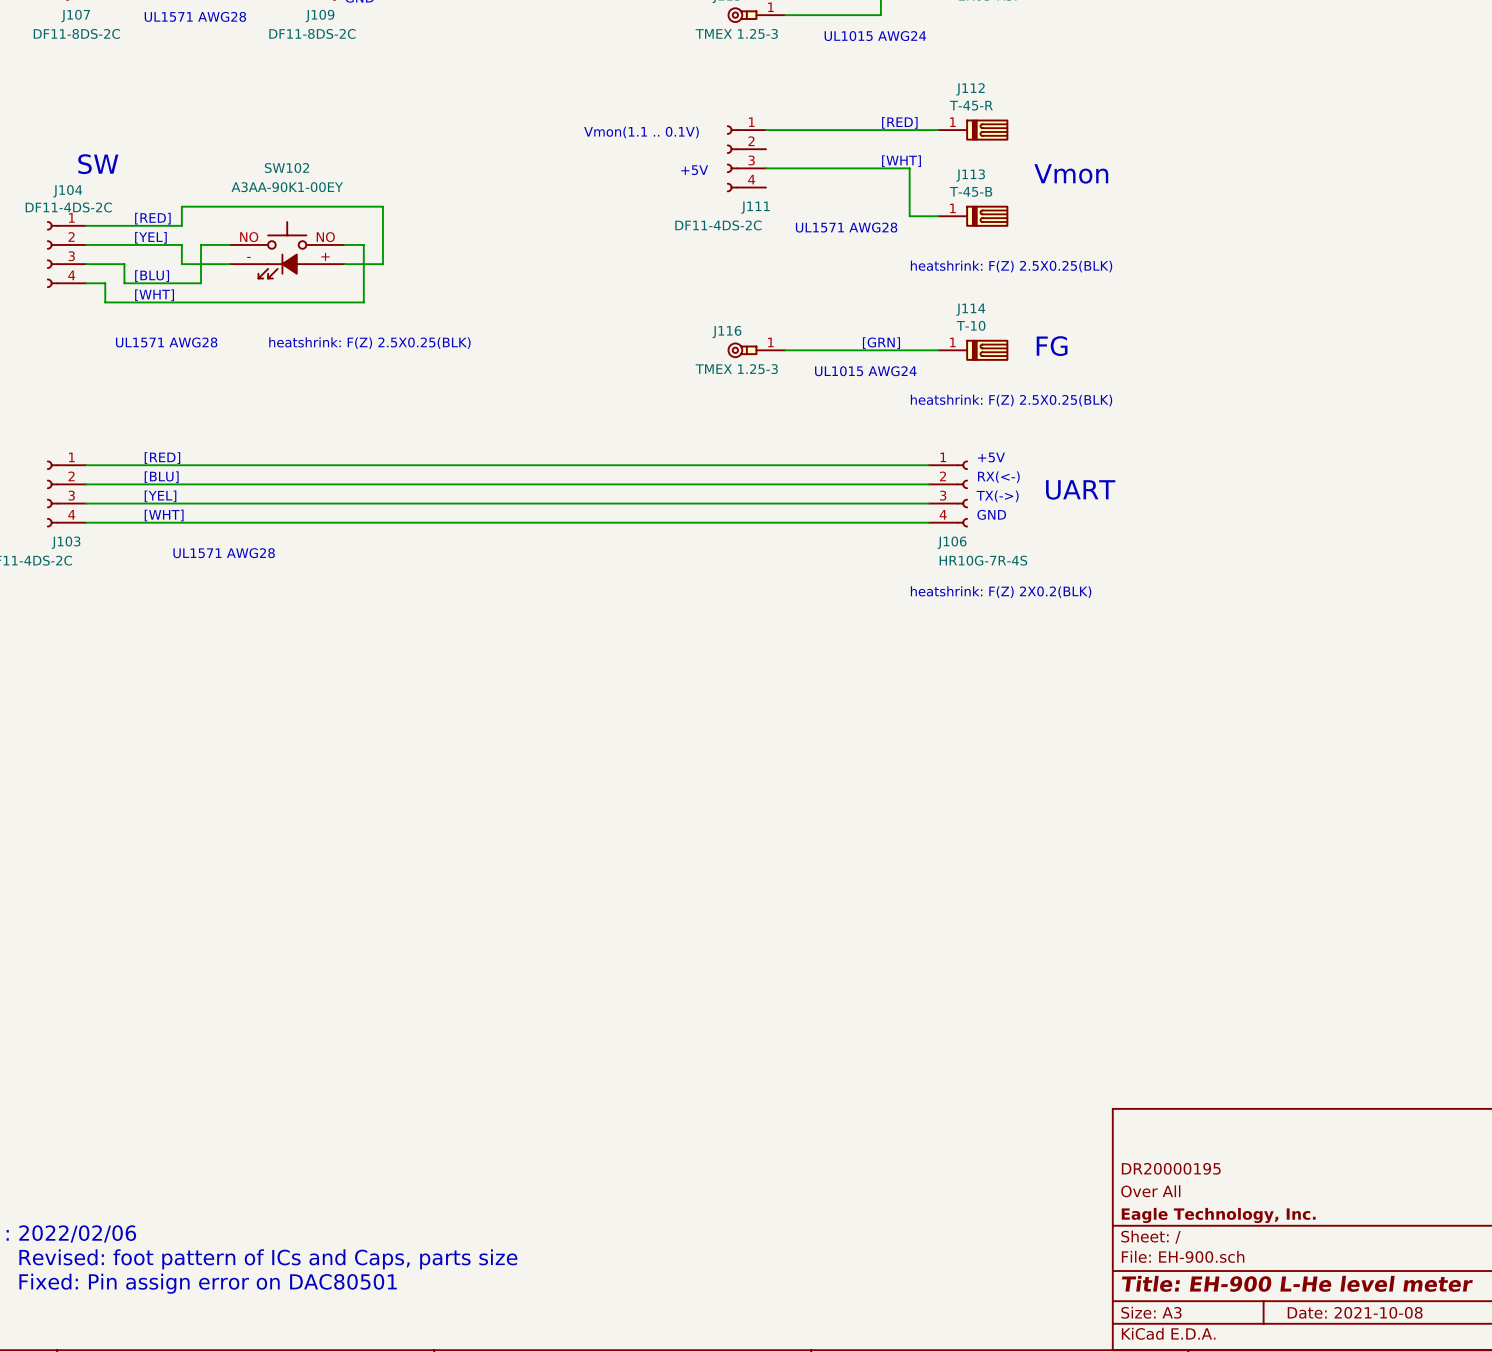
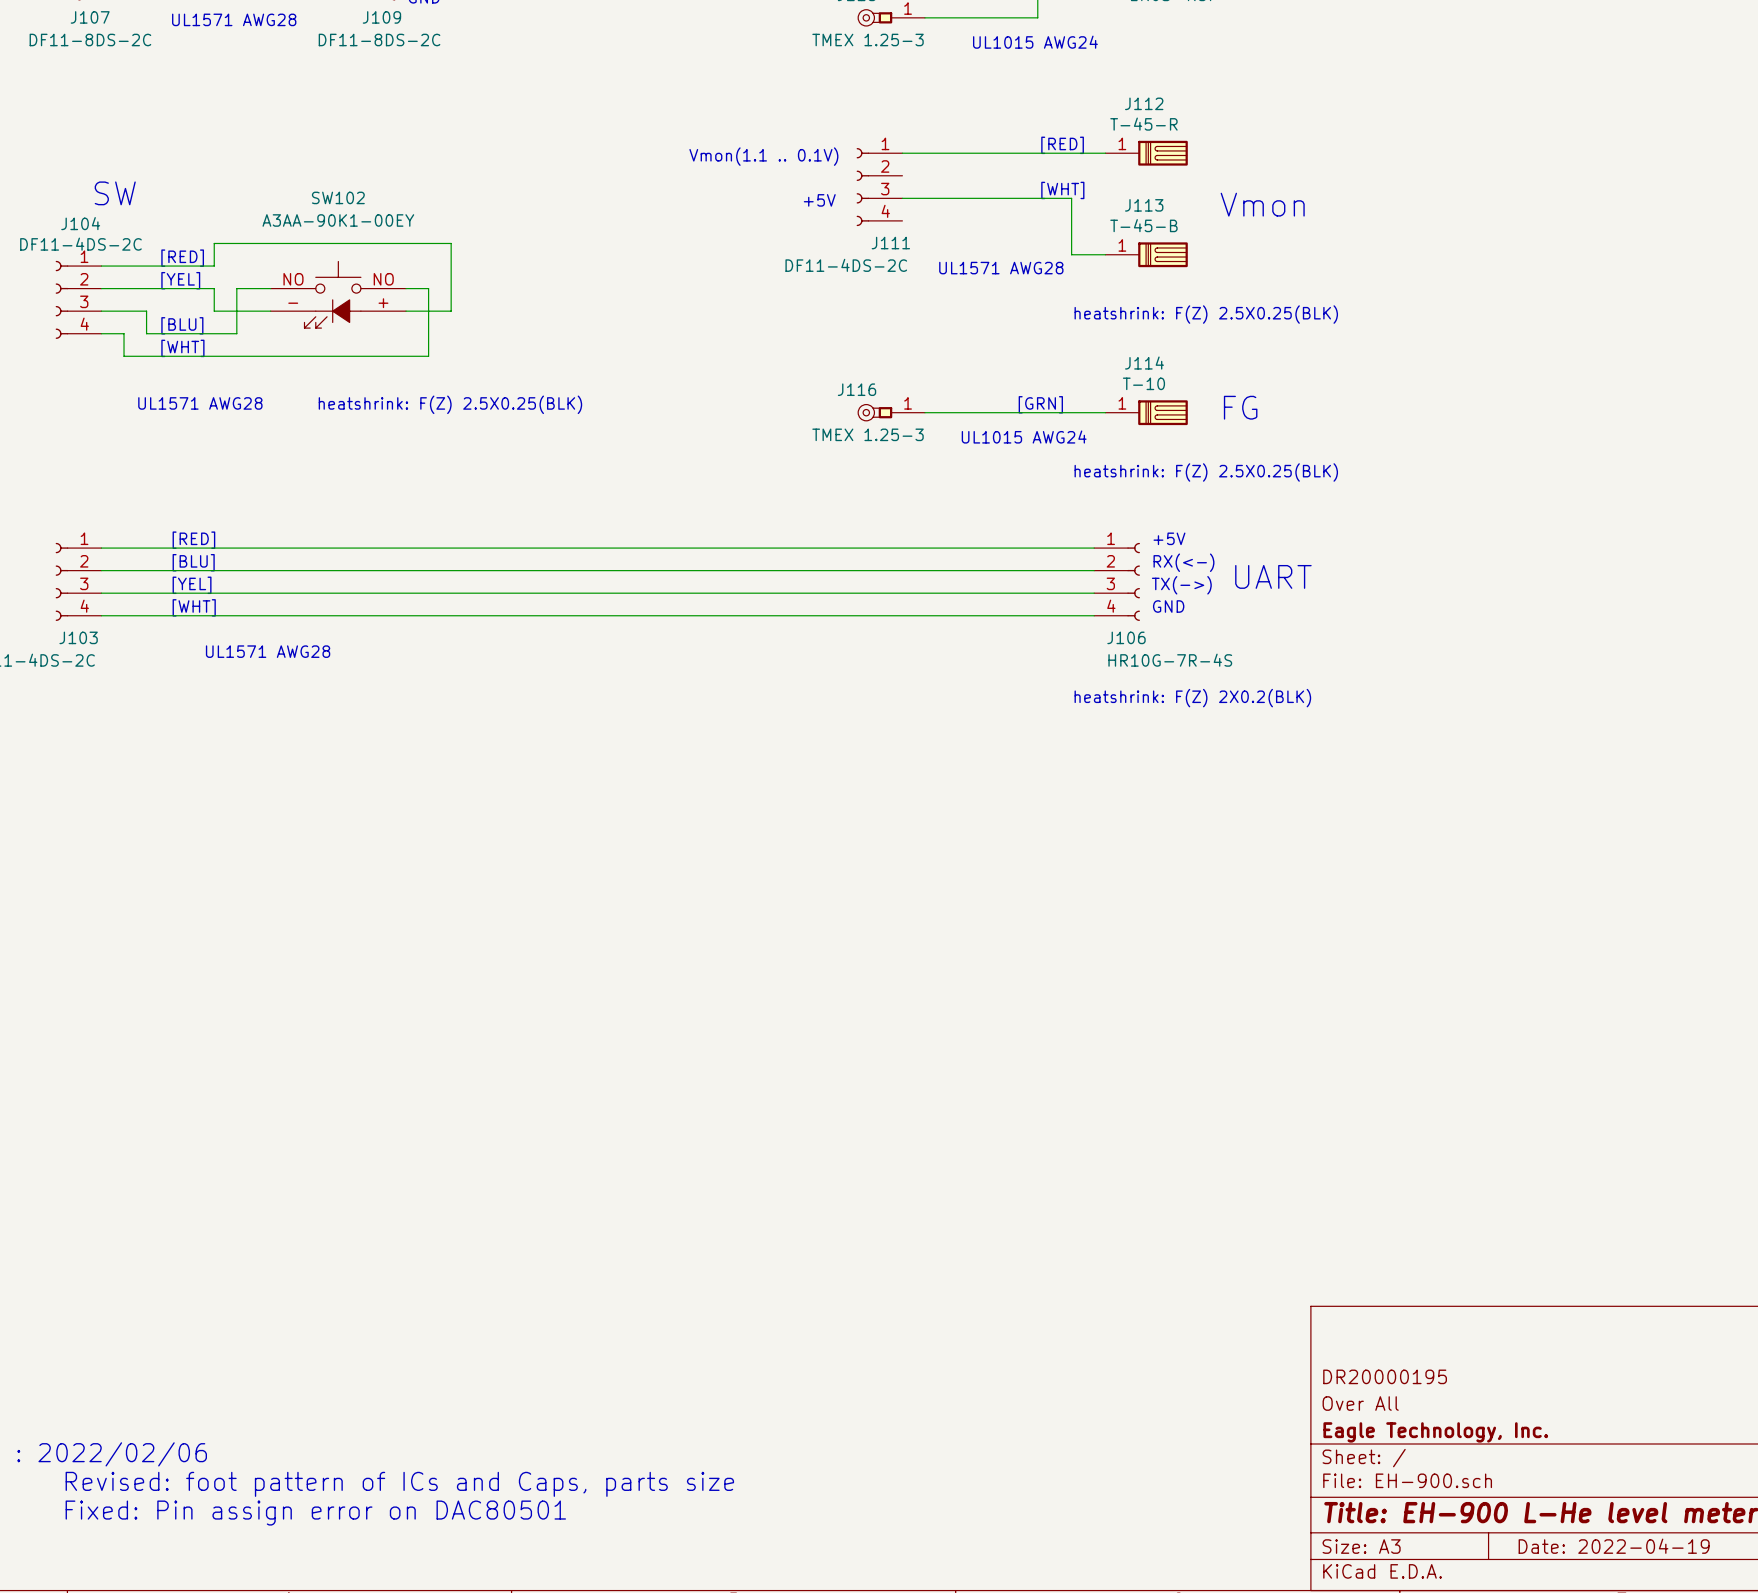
title block: Date: 2021-10-08 (1355, 1312) -> Date: 2022-04-19 (1614, 1546)

